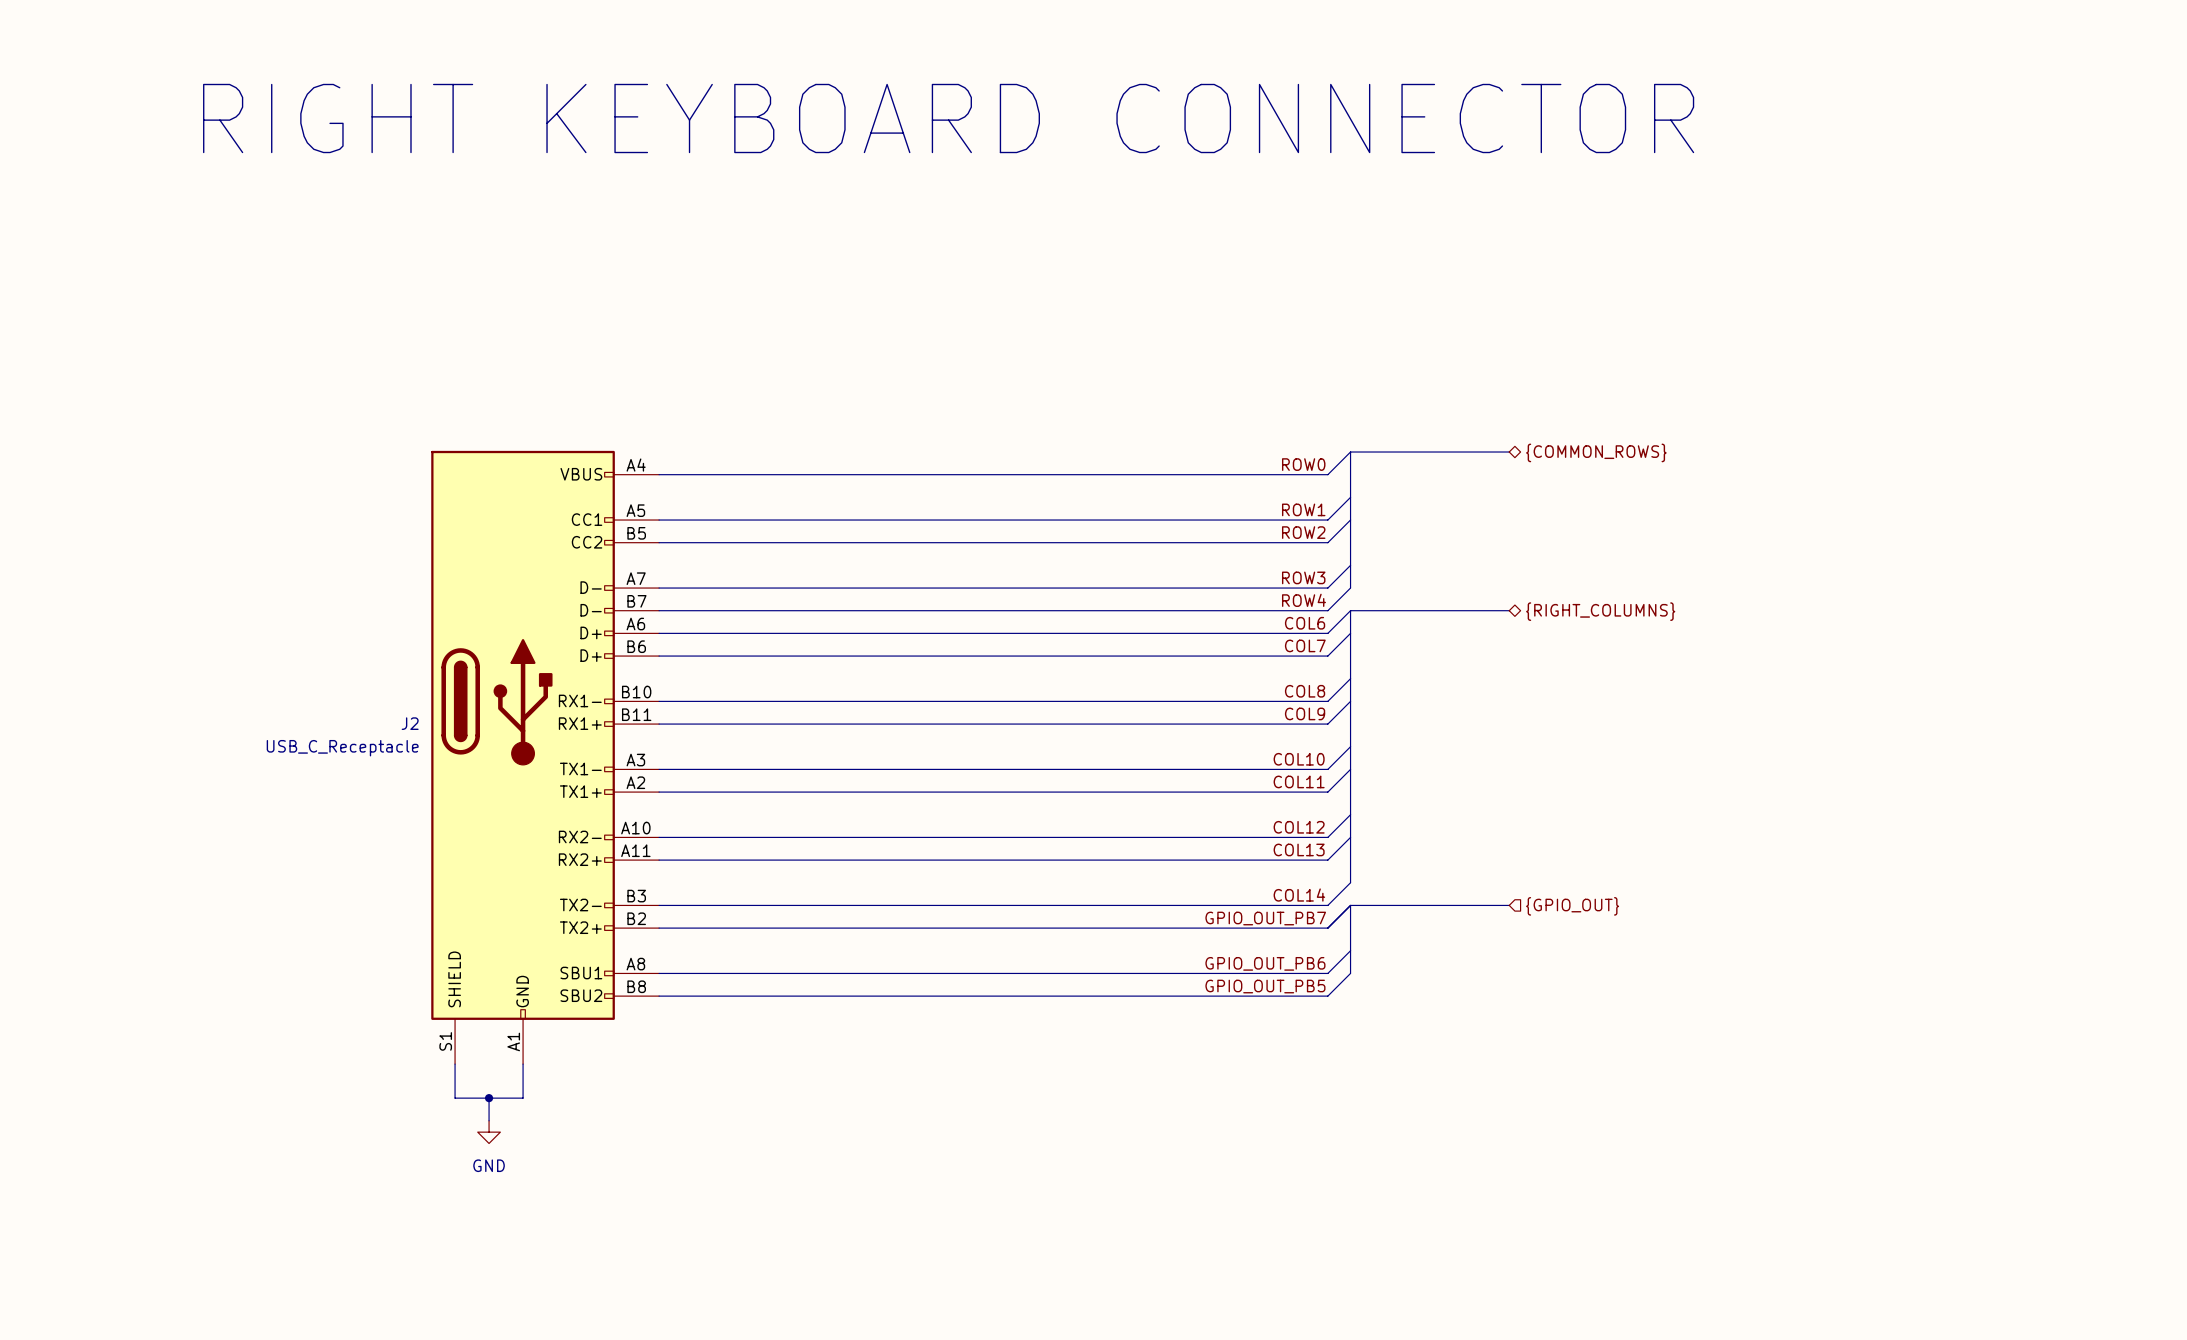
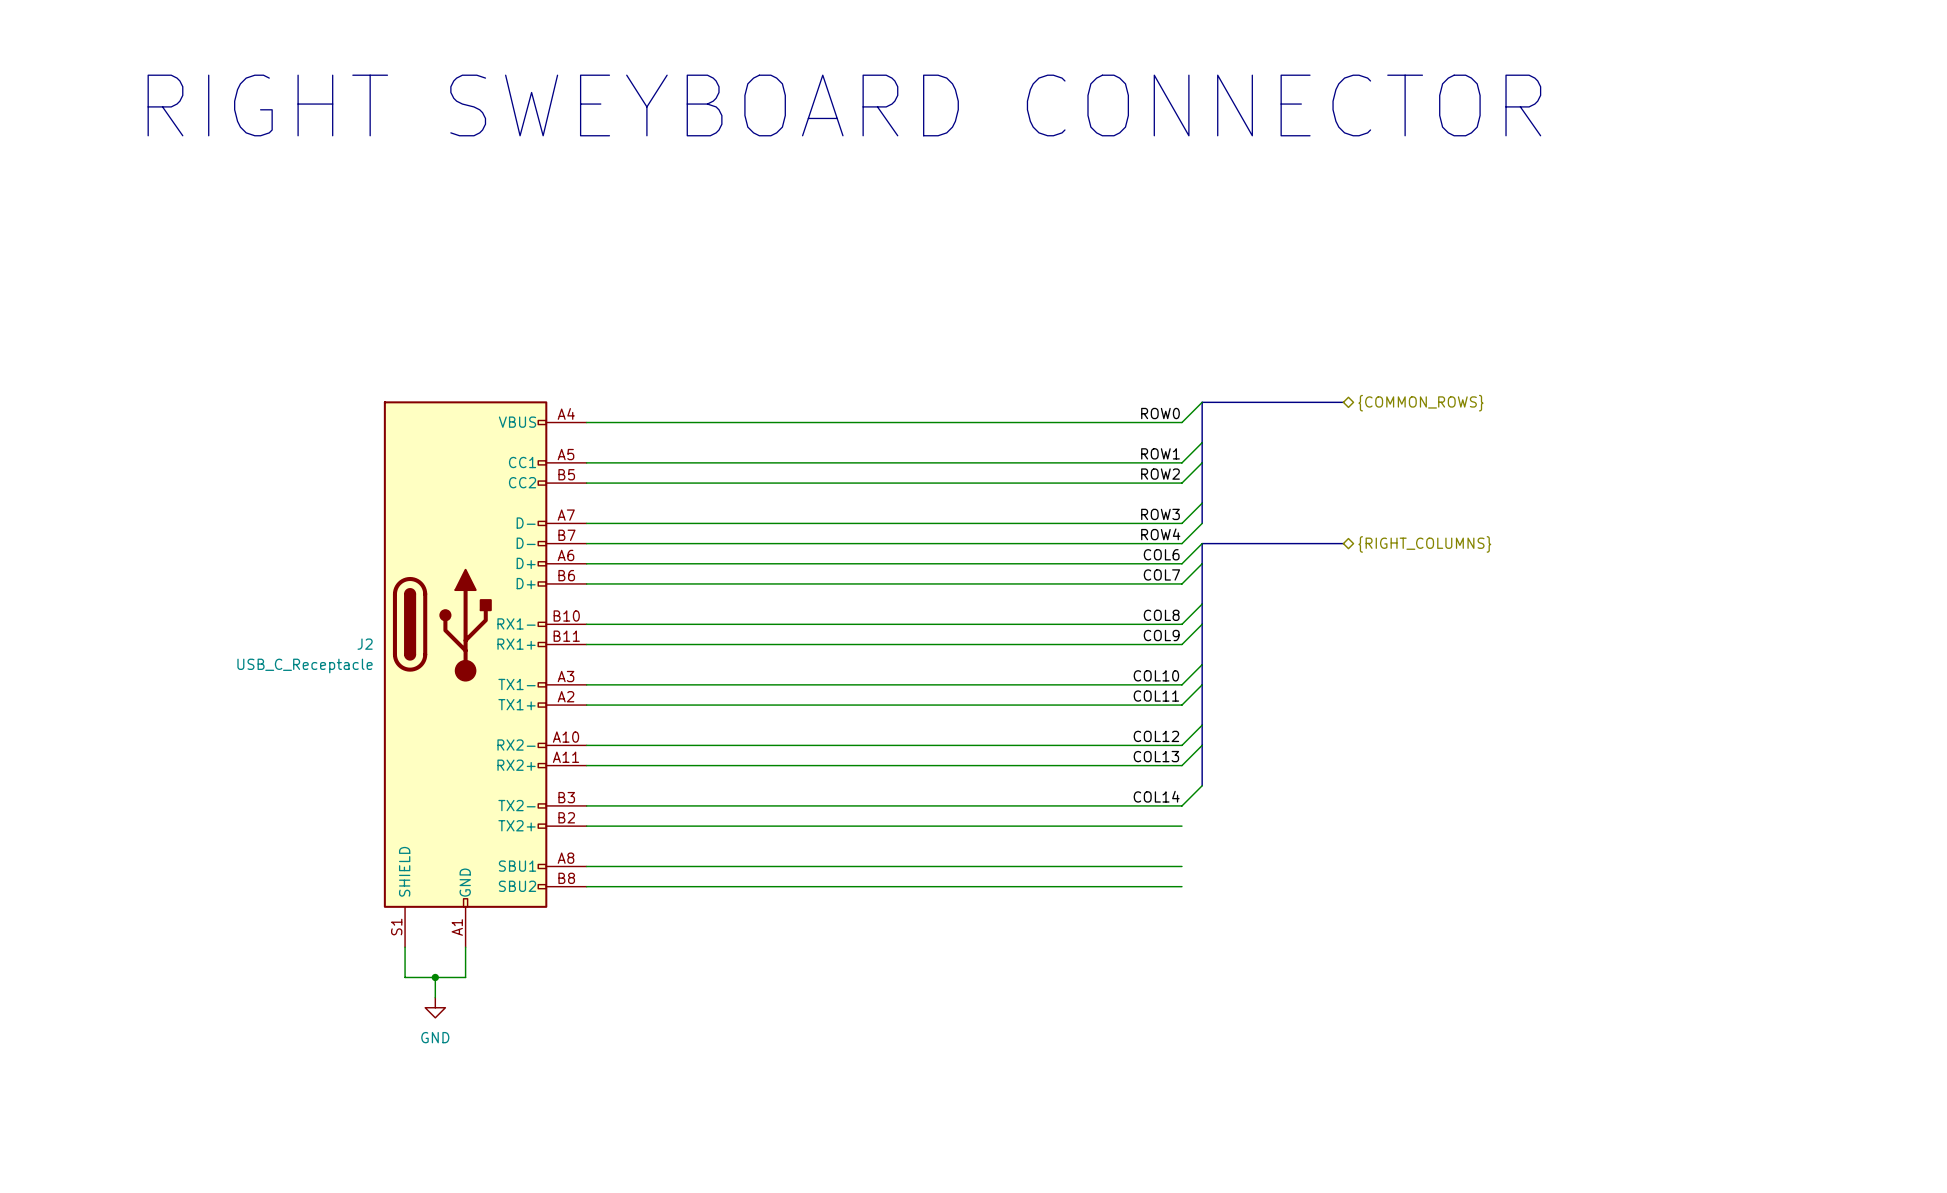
text: RIGHT KEYBOARD CONNECTOR (948, 118) -> RIGHT SWEYBOARD CONNECTOR (844, 105)
wire: (1350, 905) (1327, 928) -> none
bus: (1509, 905) (1350, 905) (1350, 973) -> none
hierarchical label: {GPIO_OUT} (1572, 906) -> none
label: GPIO_OUT_PB7 (1265, 918) -> none
wire: (1350, 950) (1327, 973) -> none
label: GPIO_OUT_PB6 (1265, 963) -> none
wire: (1350, 973) (1327, 996) -> none
label: GPIO_OUT_PB5 (1265, 986) -> none

